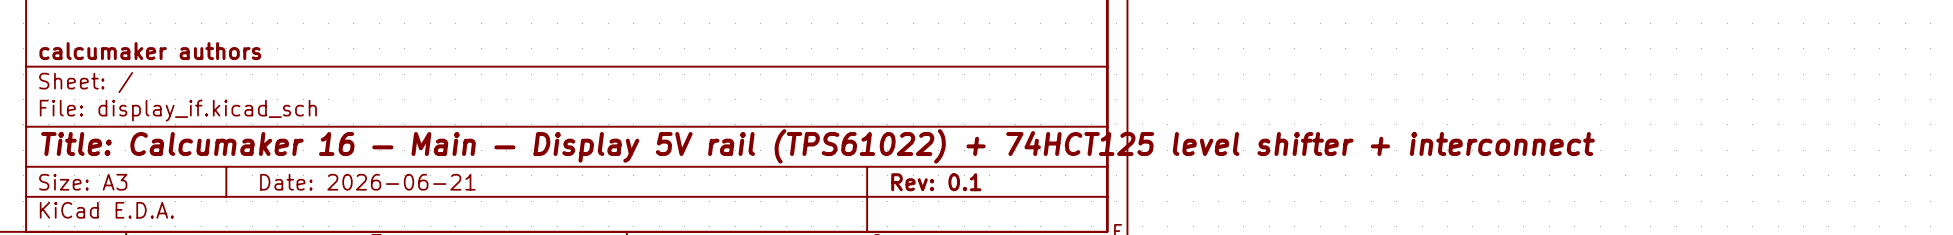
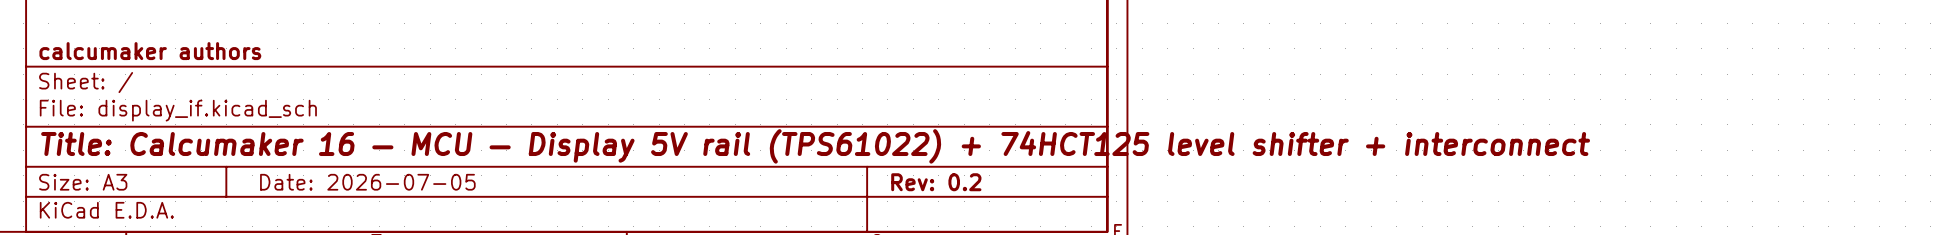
title block: Title: Calcumaker 16 — Main — Display 5V rail (TPS61022) + 74HCT125 level shifter + interconnect (817, 146) -> Title: Calcumaker 16 — MCU — Display 5V rail (TPS61022) + 74HCT125 level shifter + interconnect (815, 146)
title block: Date: 2026-06-21 (367, 182) -> Date: 2026-07-05 (367, 182)
title block: Rev: 0.1 (936, 182) -> Rev: 0.2 (936, 182)

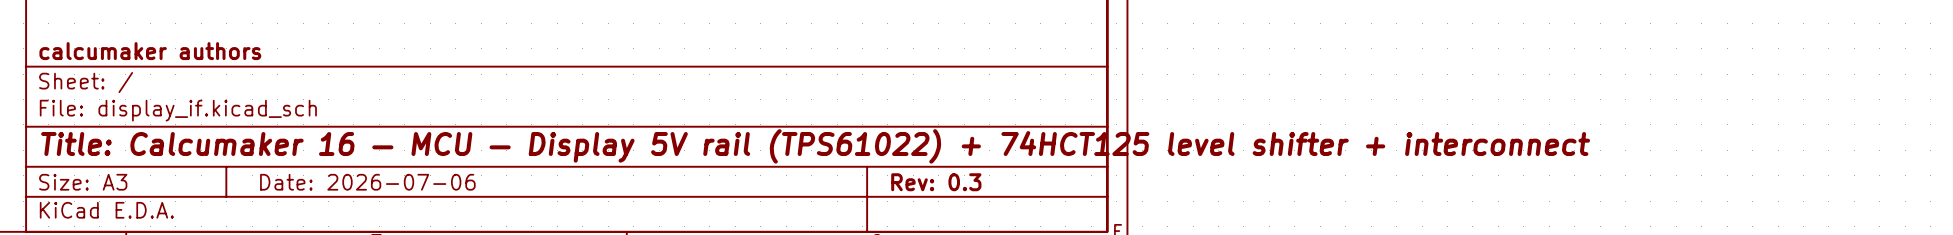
title block: Date: 2026-07-05 (367, 182) -> Date: 2026-07-06 (367, 182)
title block: Rev: 0.2 (936, 182) -> Rev: 0.3 (936, 182)

